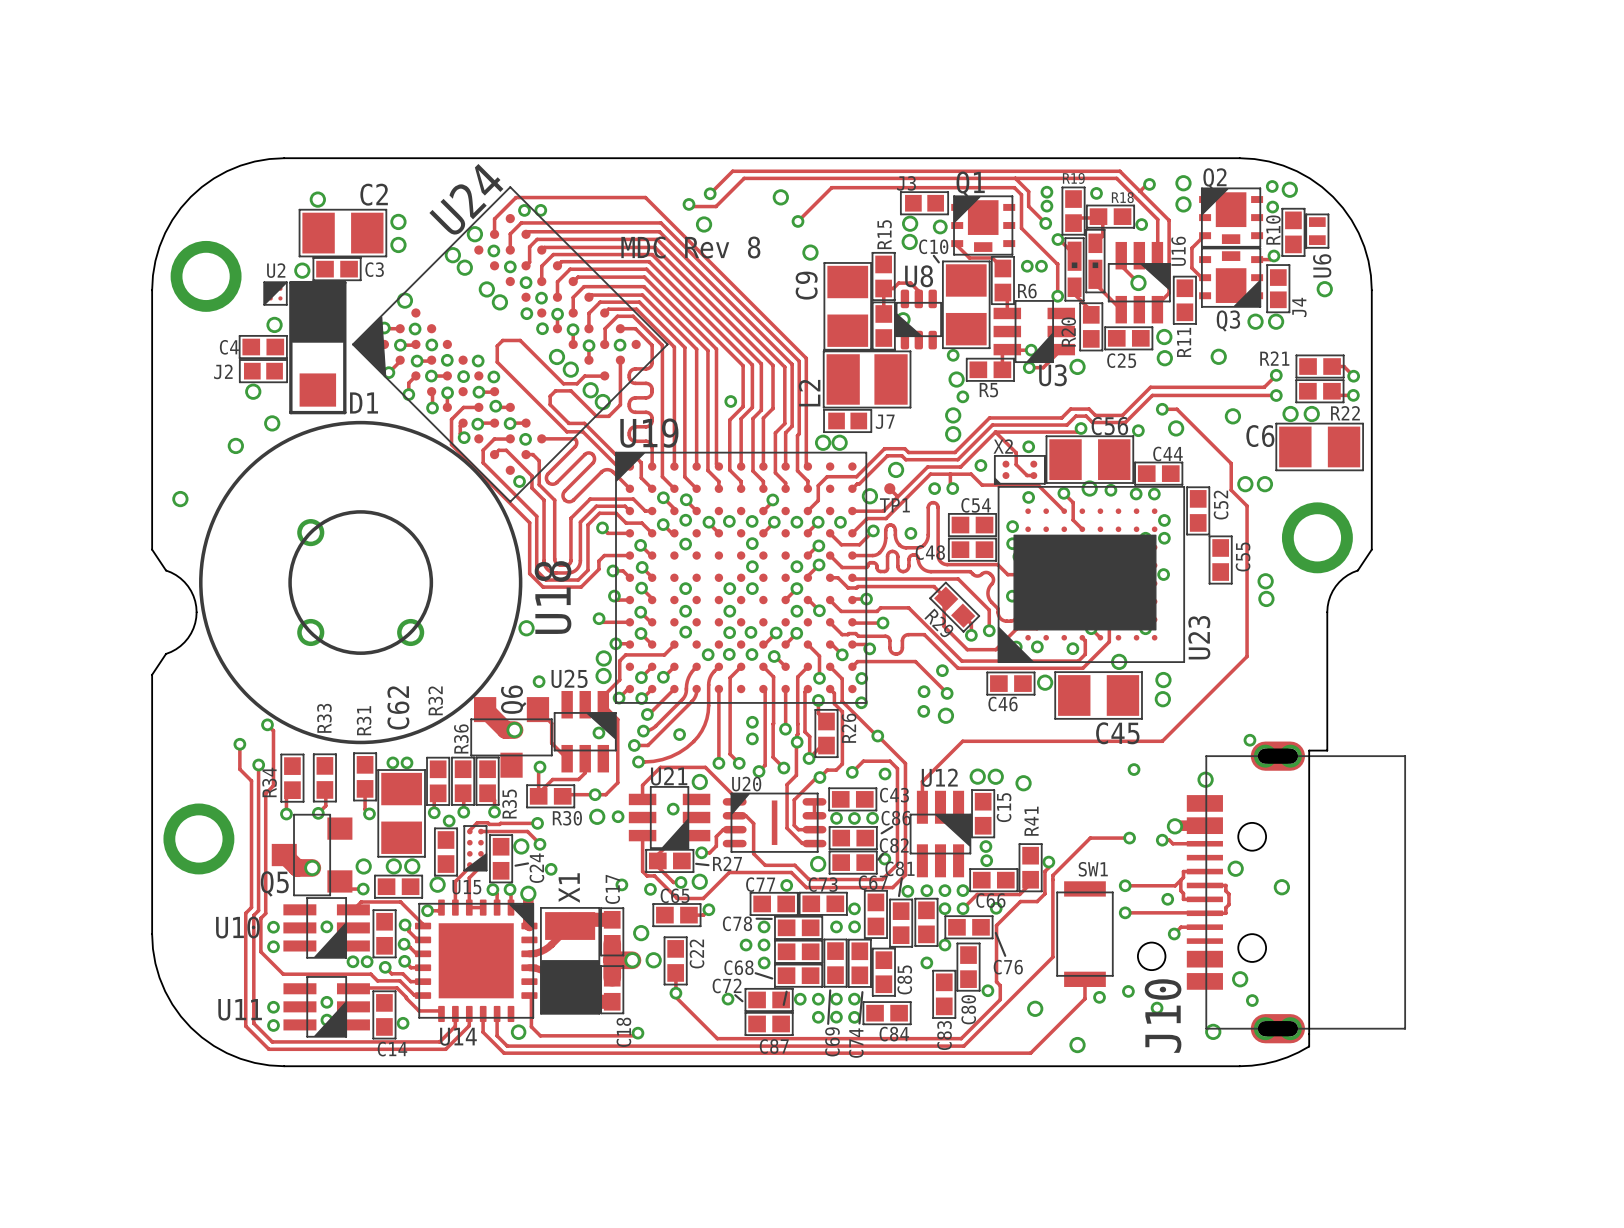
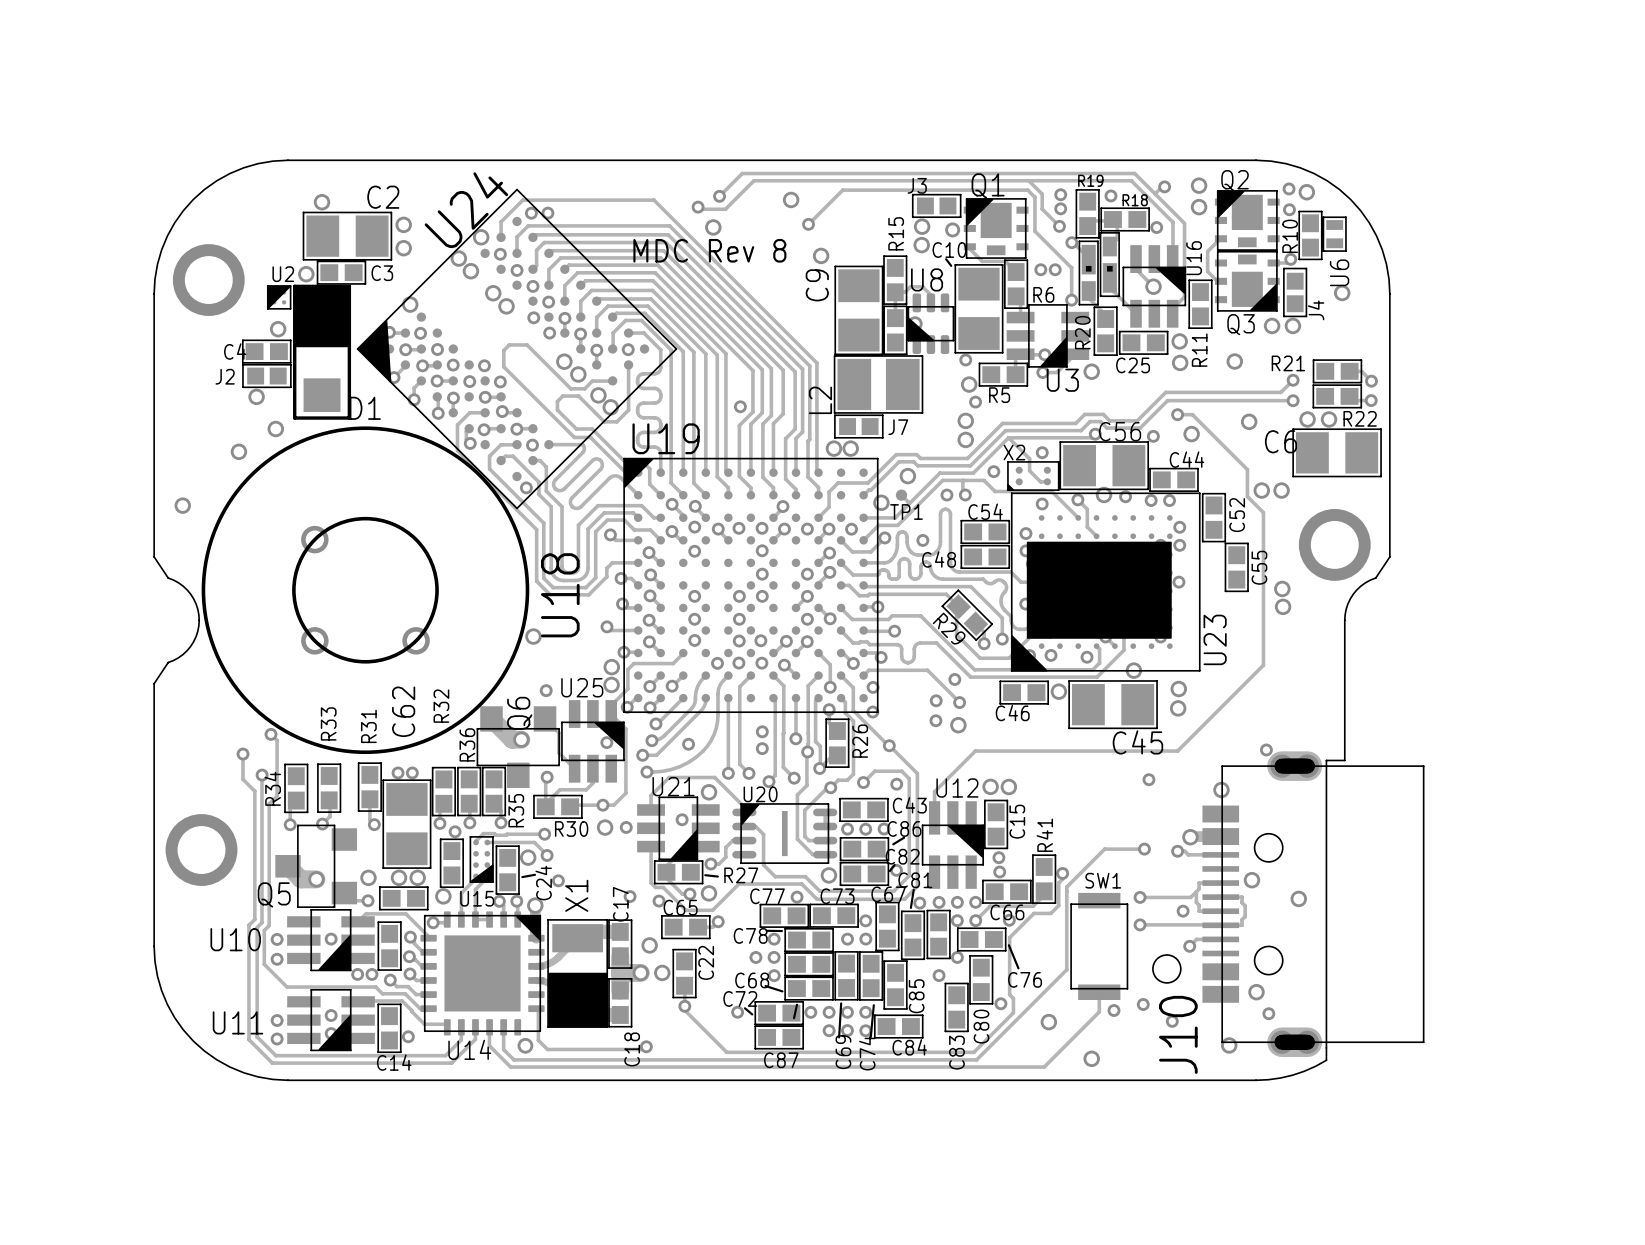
via: (1023, 783) -> none

